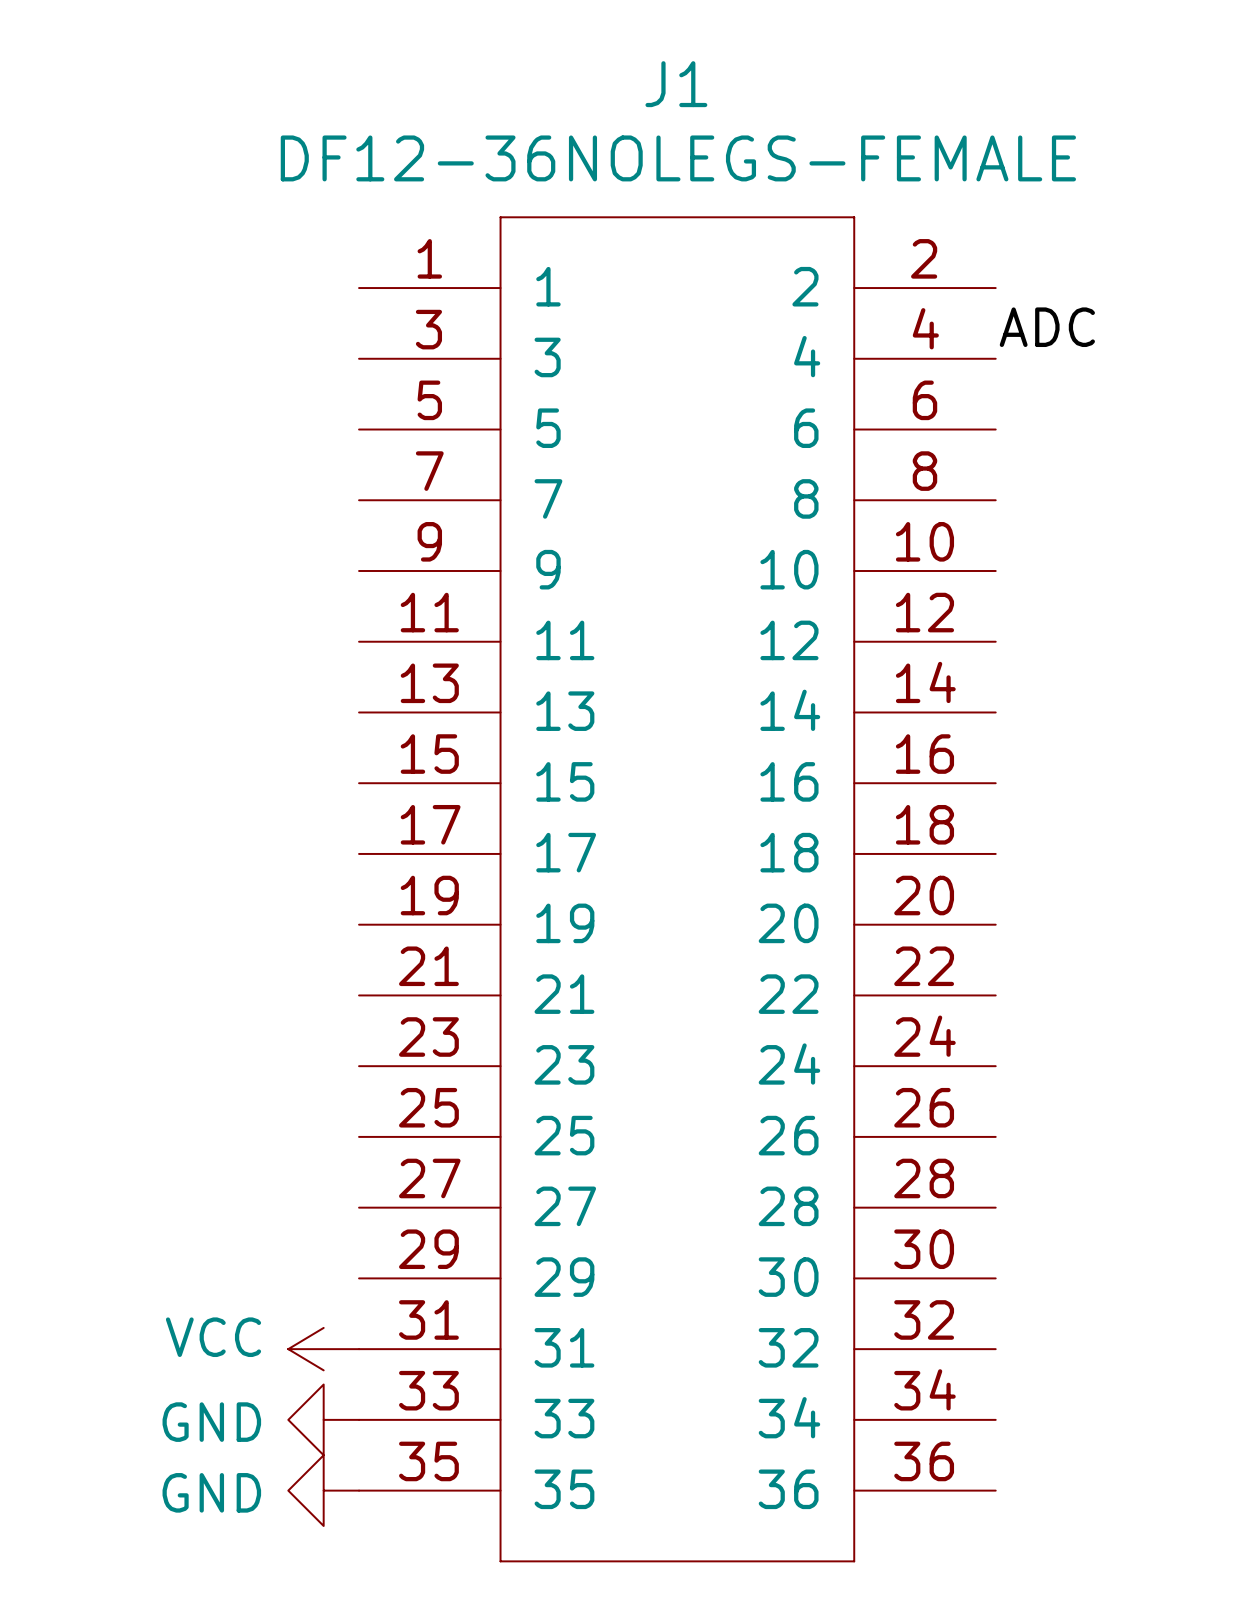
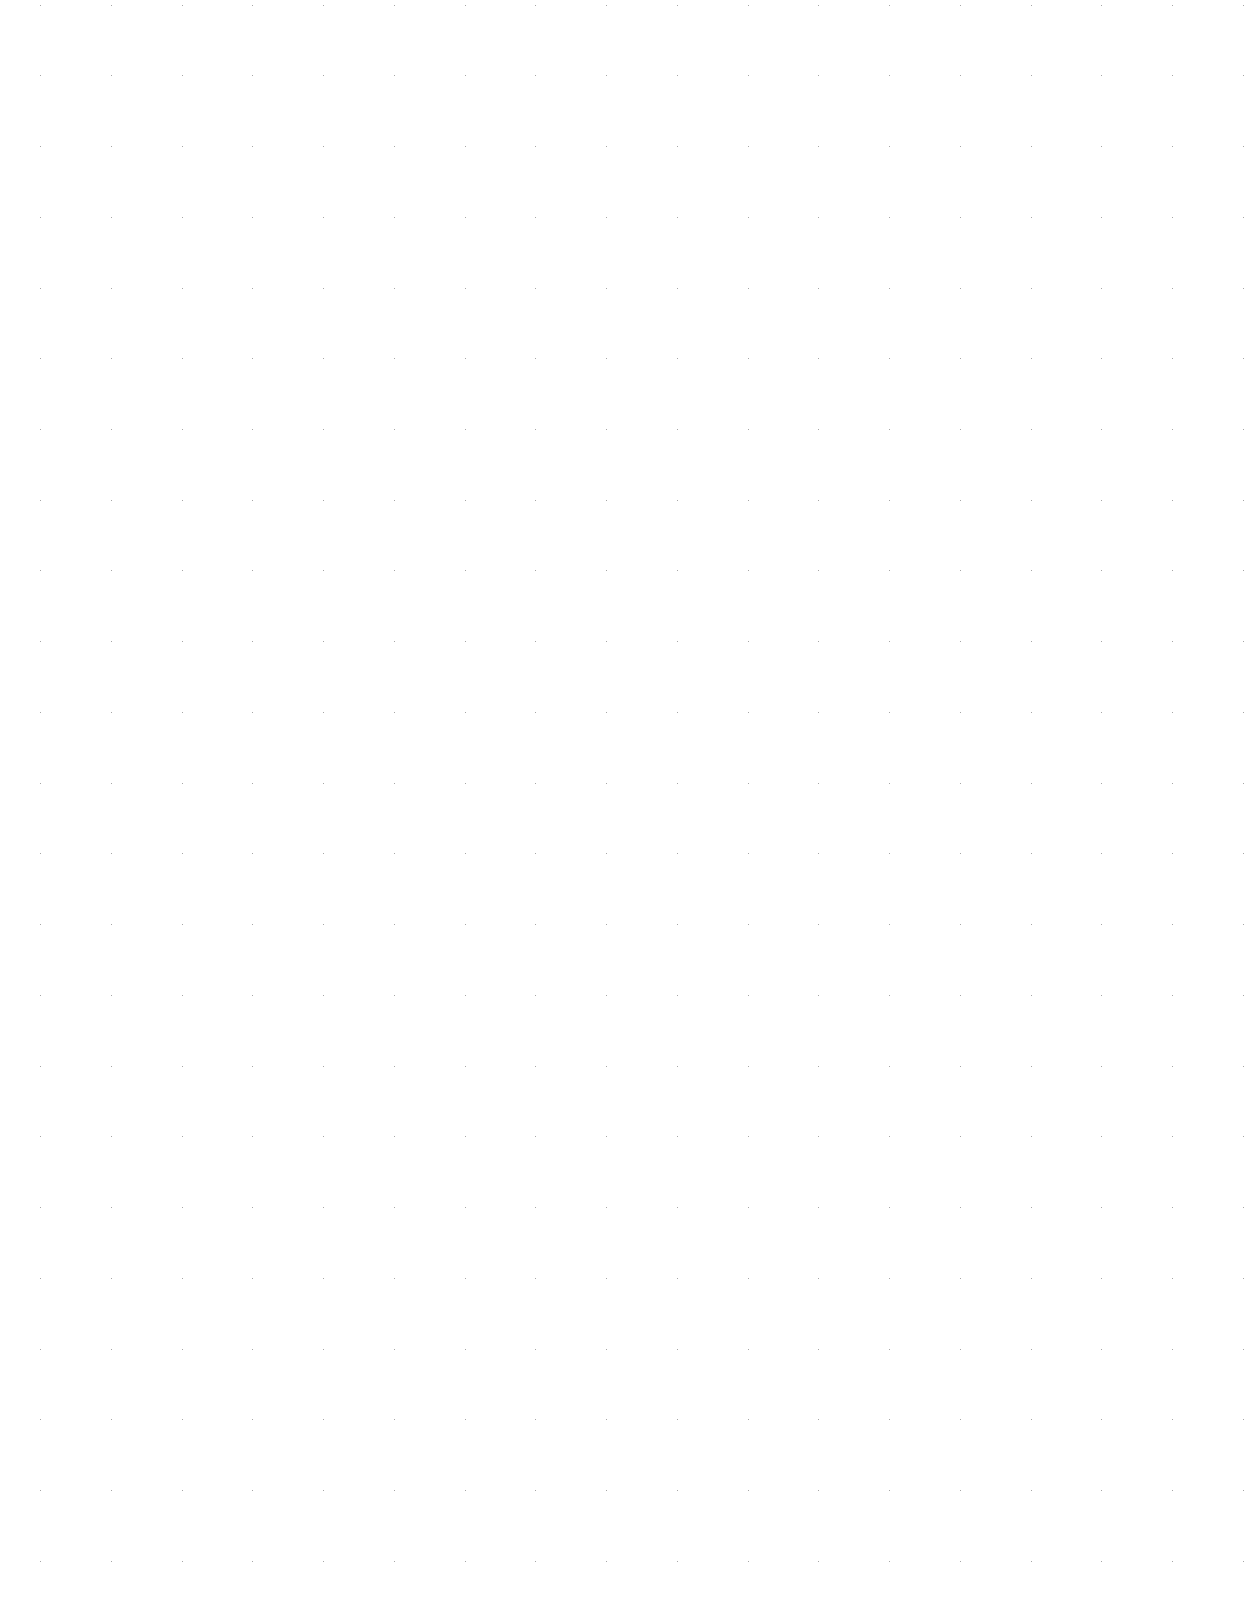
label: ADC (1047, 327) -> none
J1: DF12-36NOLEGS-FEMALE (677, 889) -> none
power symbol: VCC (323, 1349) -> none
power symbol: GND (323, 1419) -> none
power symbol: GND (323, 1490) -> none

